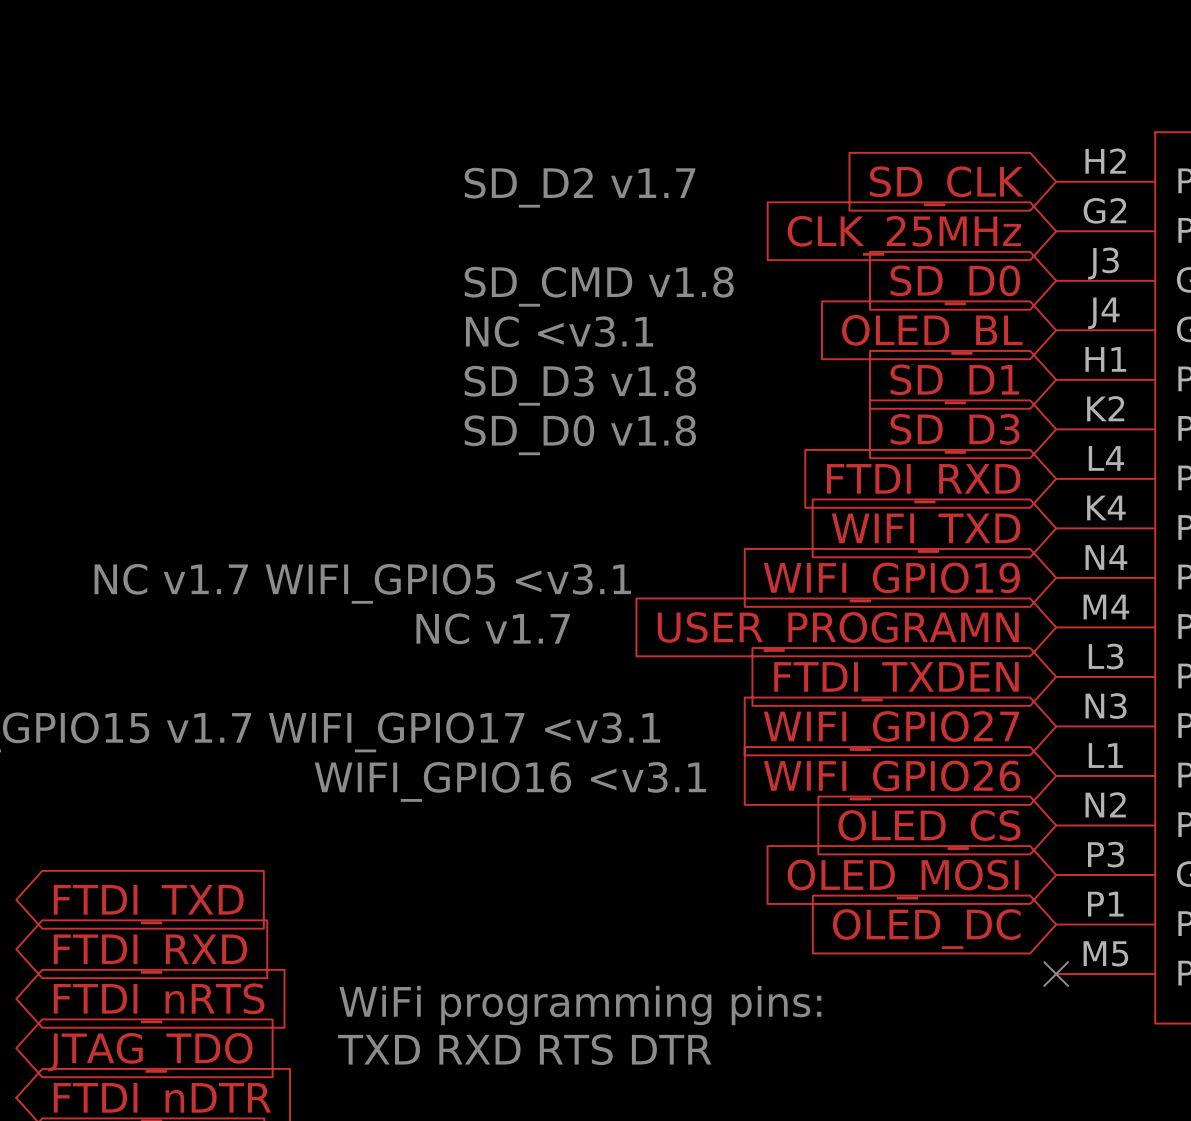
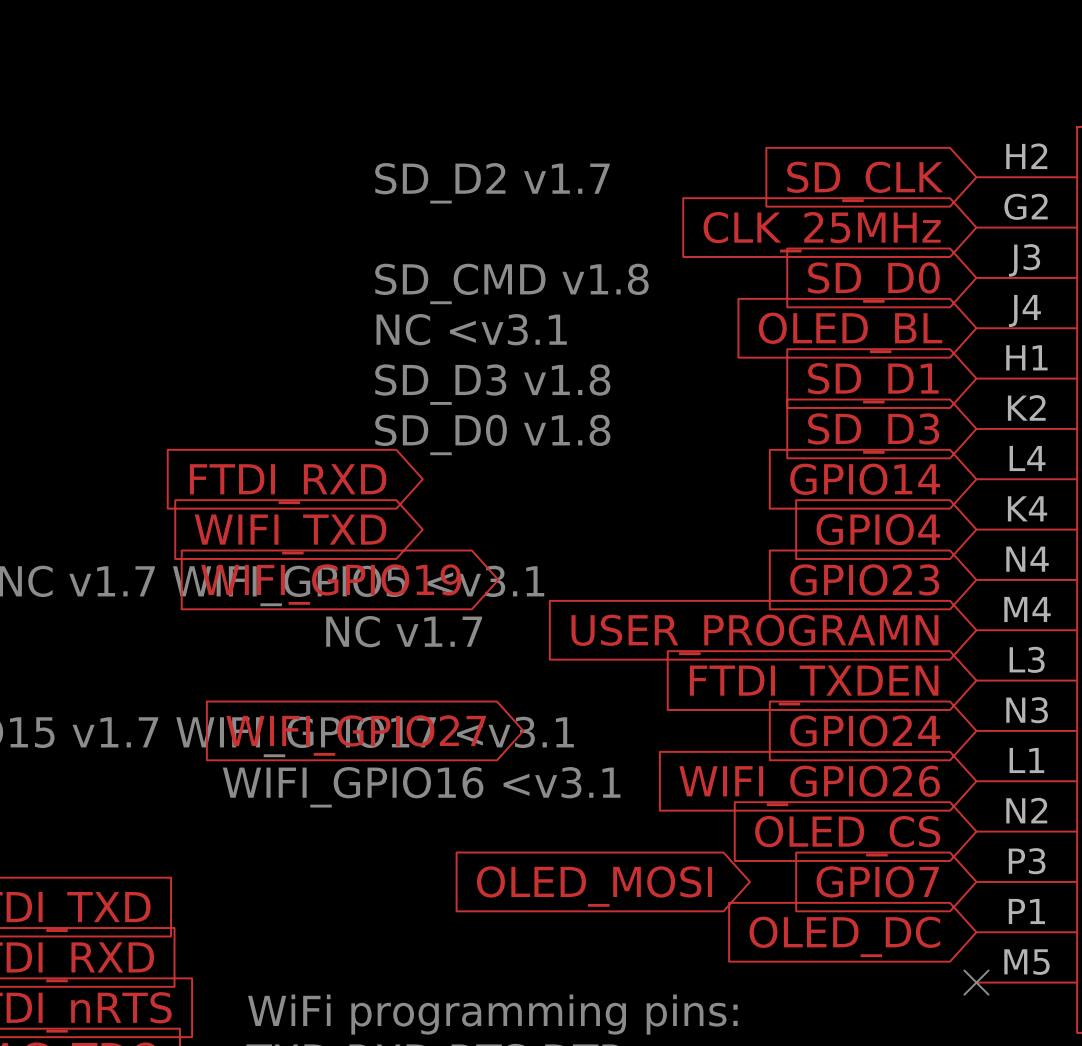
global label: none -> FTDI_RXD (288, 484)
global label: FTDI_RXD (923, 483) -> GPIO14 (865, 479)
global label: none -> WIFI_TXD (290, 534)
global label: WIFI_TXD (926, 533) -> GPIO4 (878, 529)
global label: none -> WIFI_GPIO19 (331, 584)
global label: WIFI_GPIO19 (891, 582) -> GPIO23 (864, 579)
global label: none -> WIFI_GPIO27 (356, 735)
global label: WIFI_GPIO27 (891, 730) -> GPIO24 (865, 730)
global label: none -> OLED_MOSI (594, 886)
global label: OLED_MOSI (903, 879) -> GPIO7 (877, 881)

